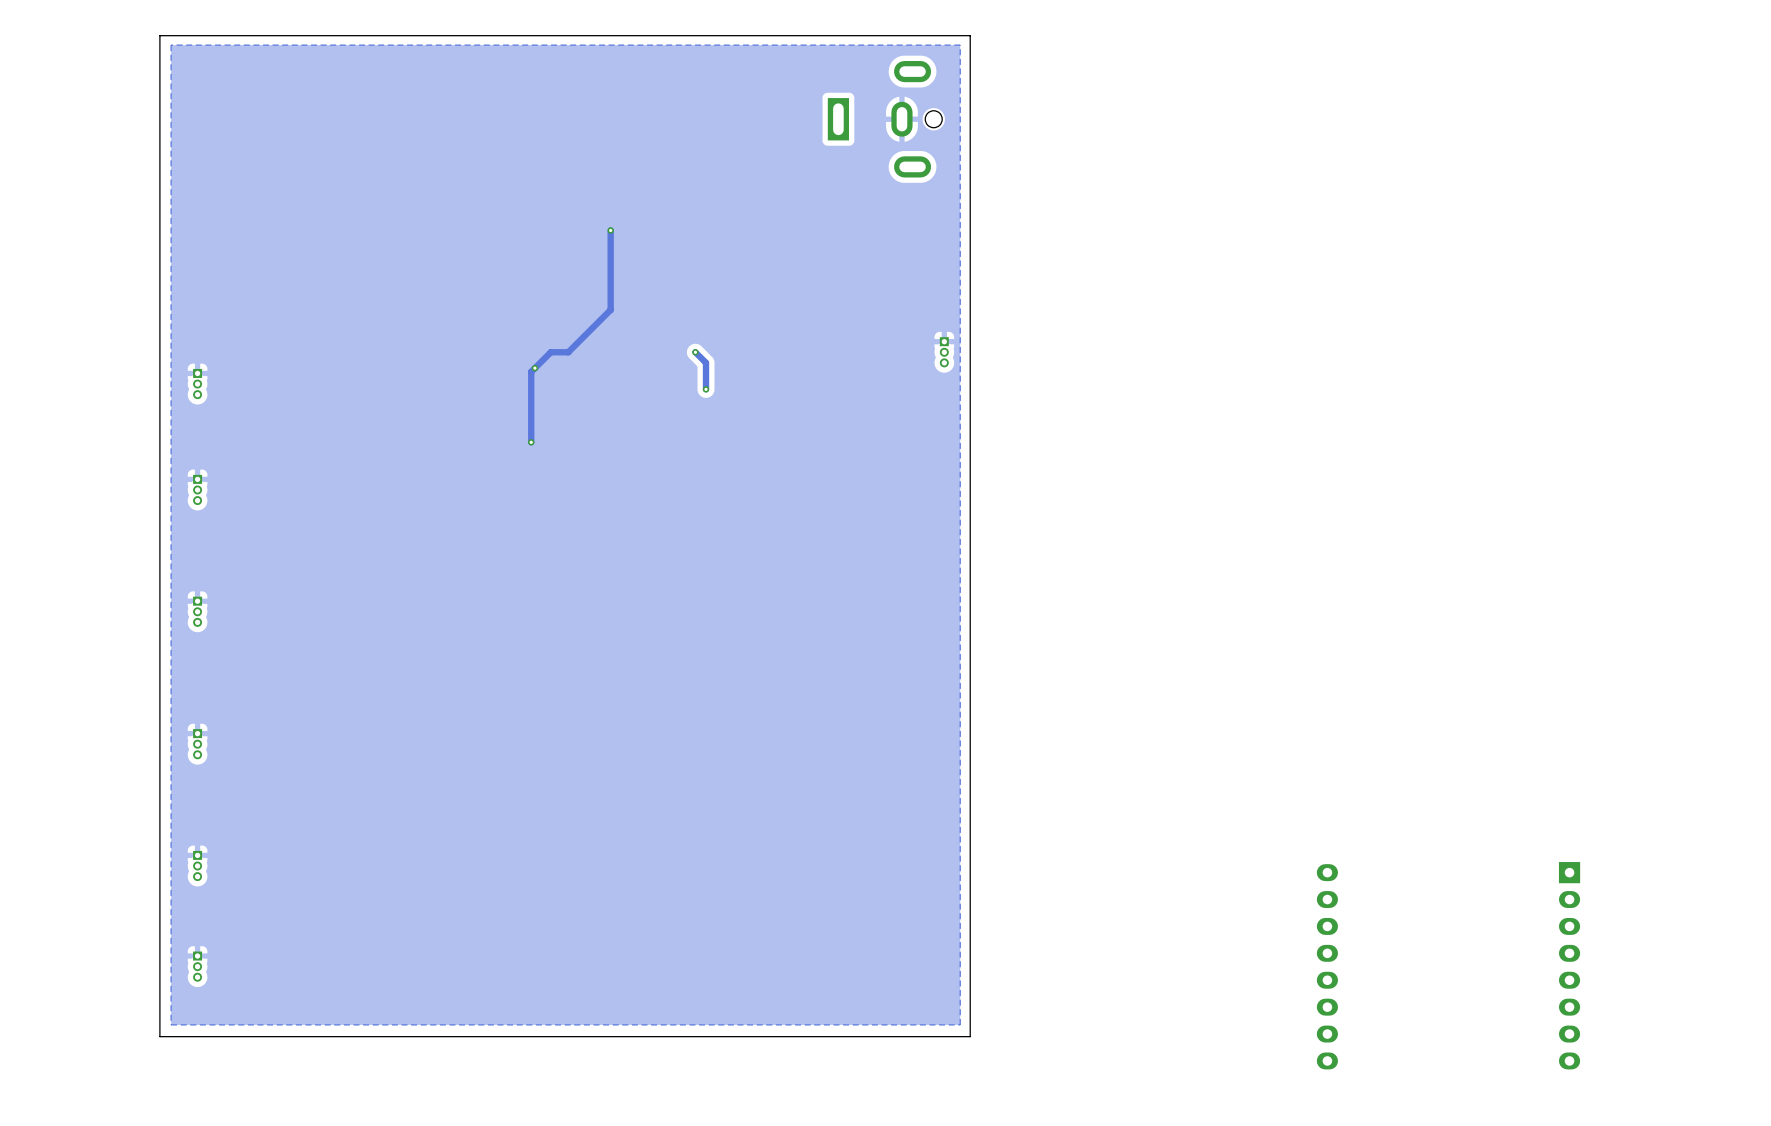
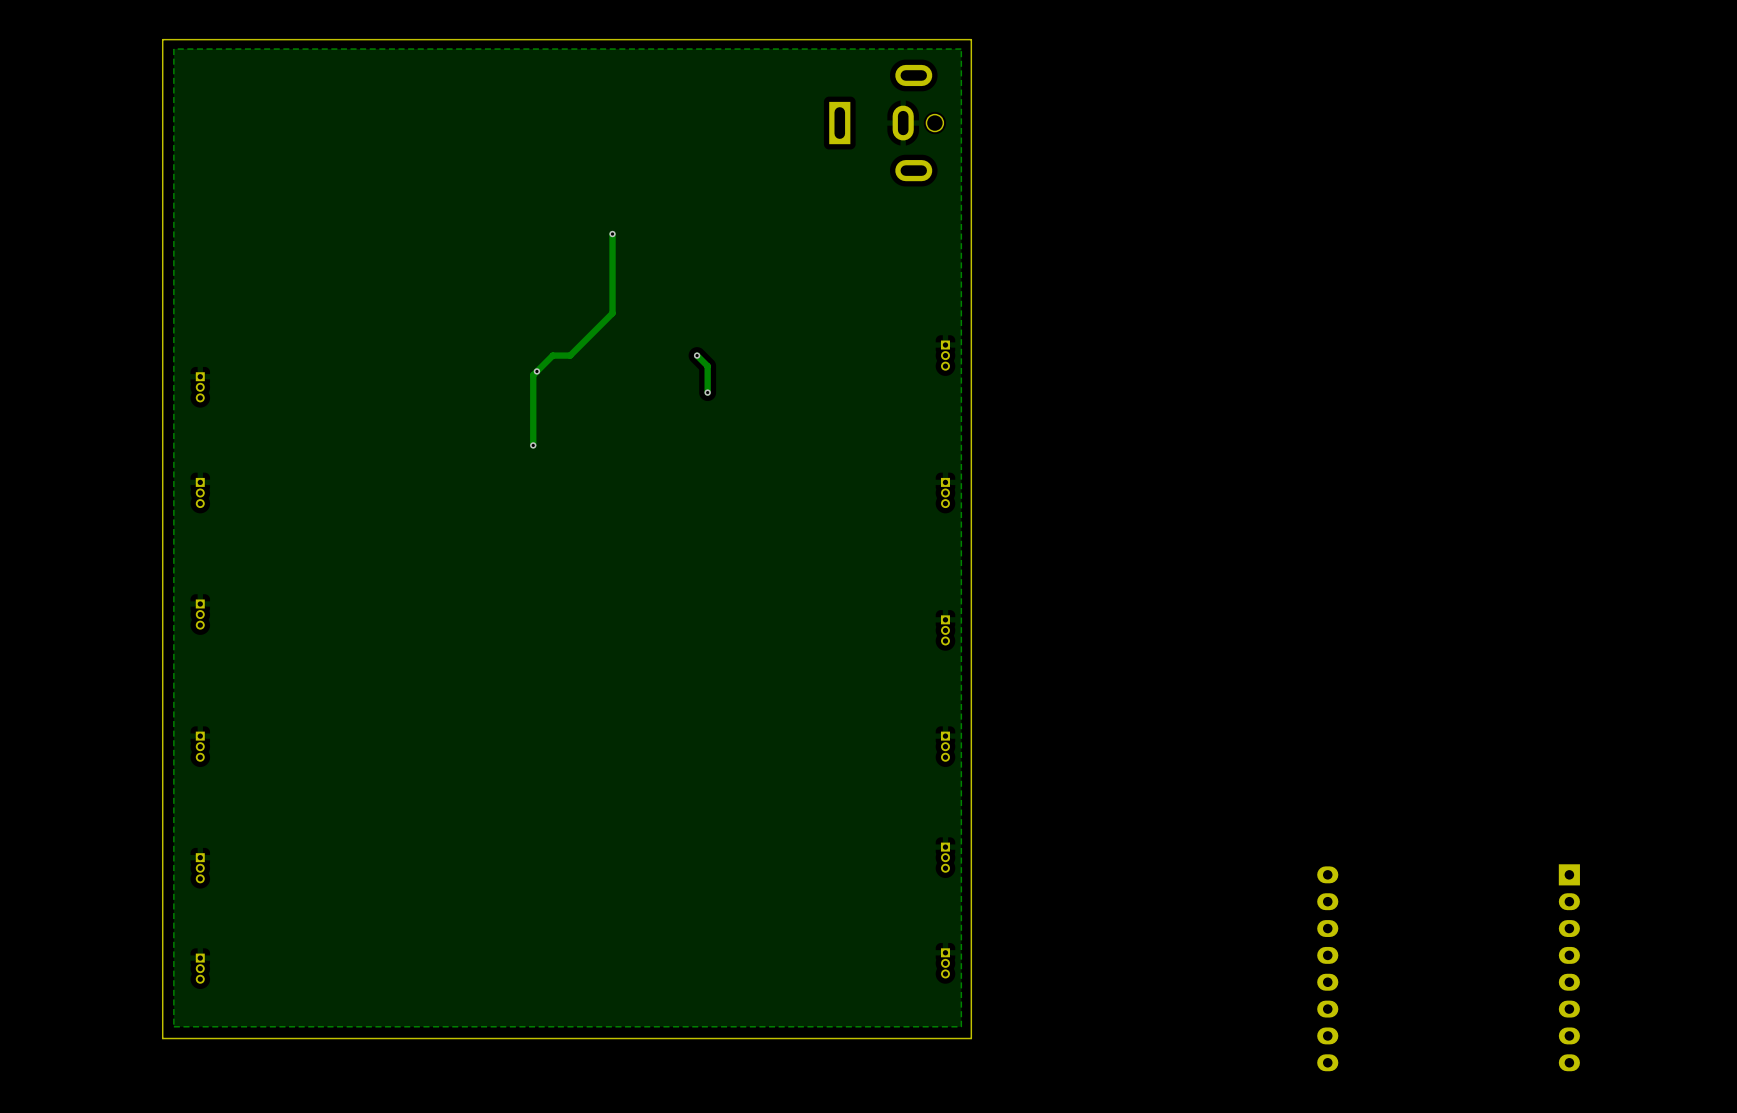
part: none -> (945, 492)
part: none -> (945, 630)
part: none -> (945, 746)
part: none -> (945, 857)
part: none -> (945, 963)

